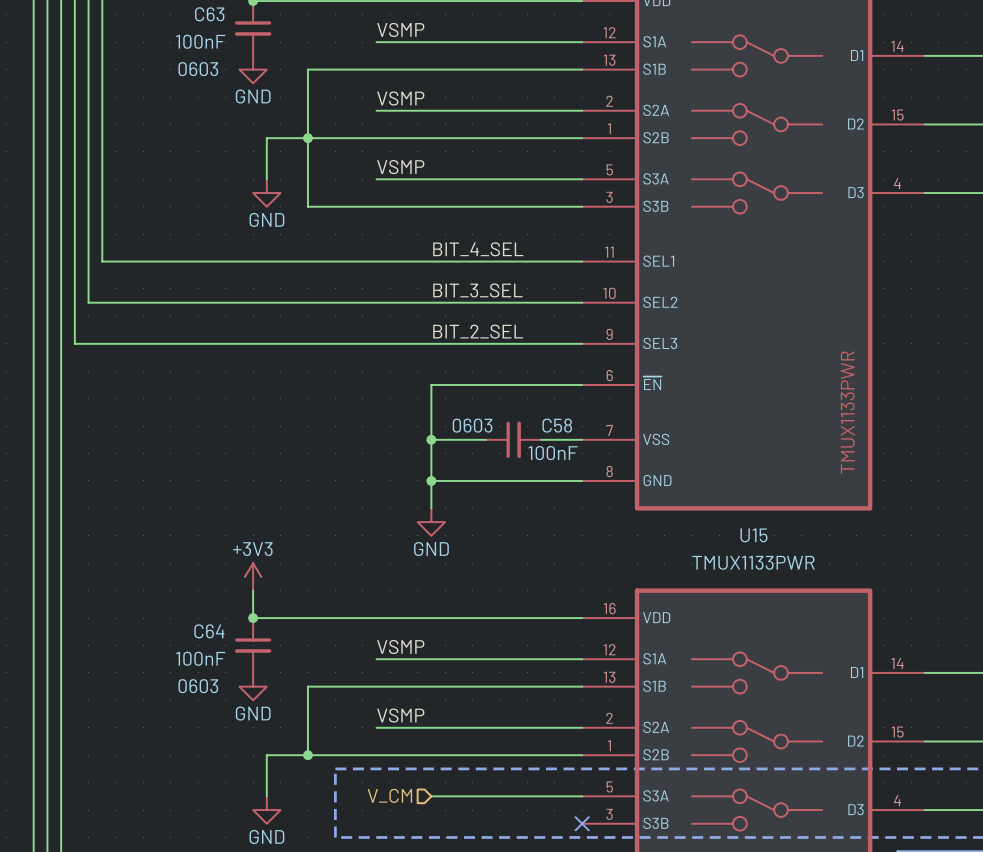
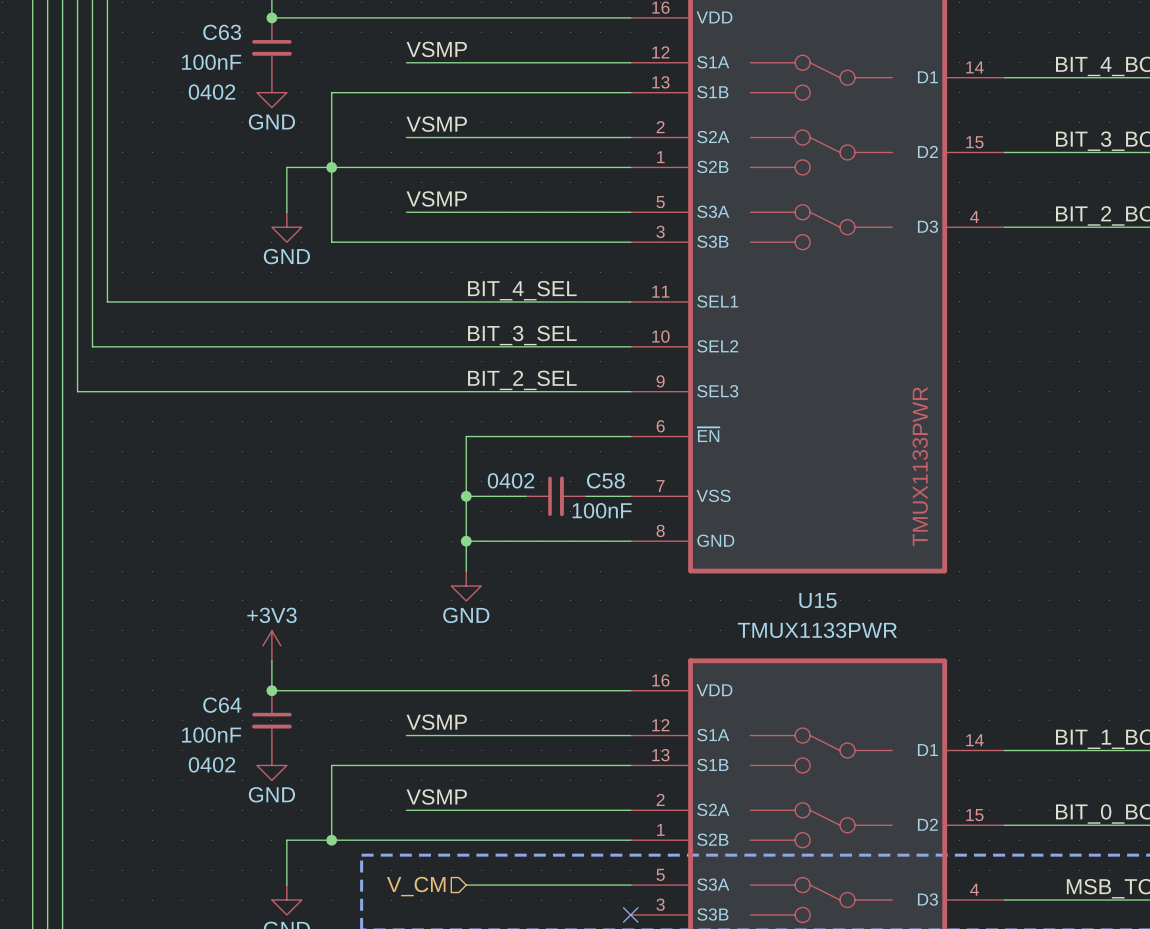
C63 text: 0603 (198, 69) -> 0402 (211, 92)
C58 text: 0603 (472, 425) -> 0402 (511, 480)
C64 text: 0603 (198, 686) -> 0402 (211, 764)

